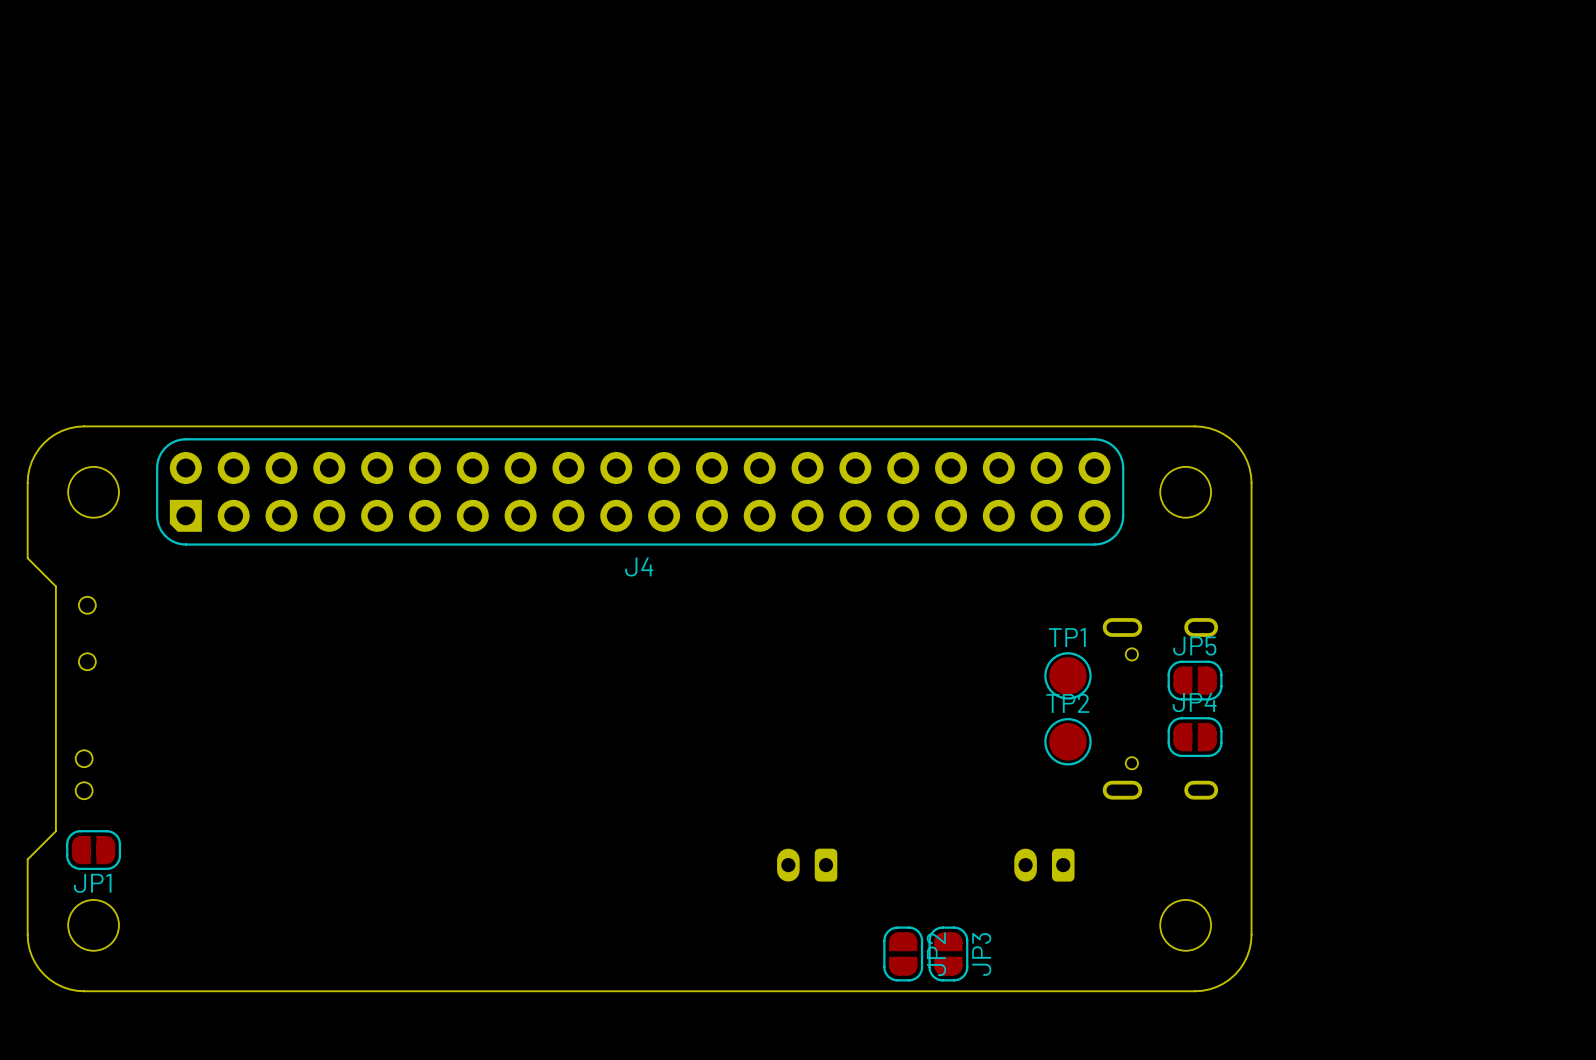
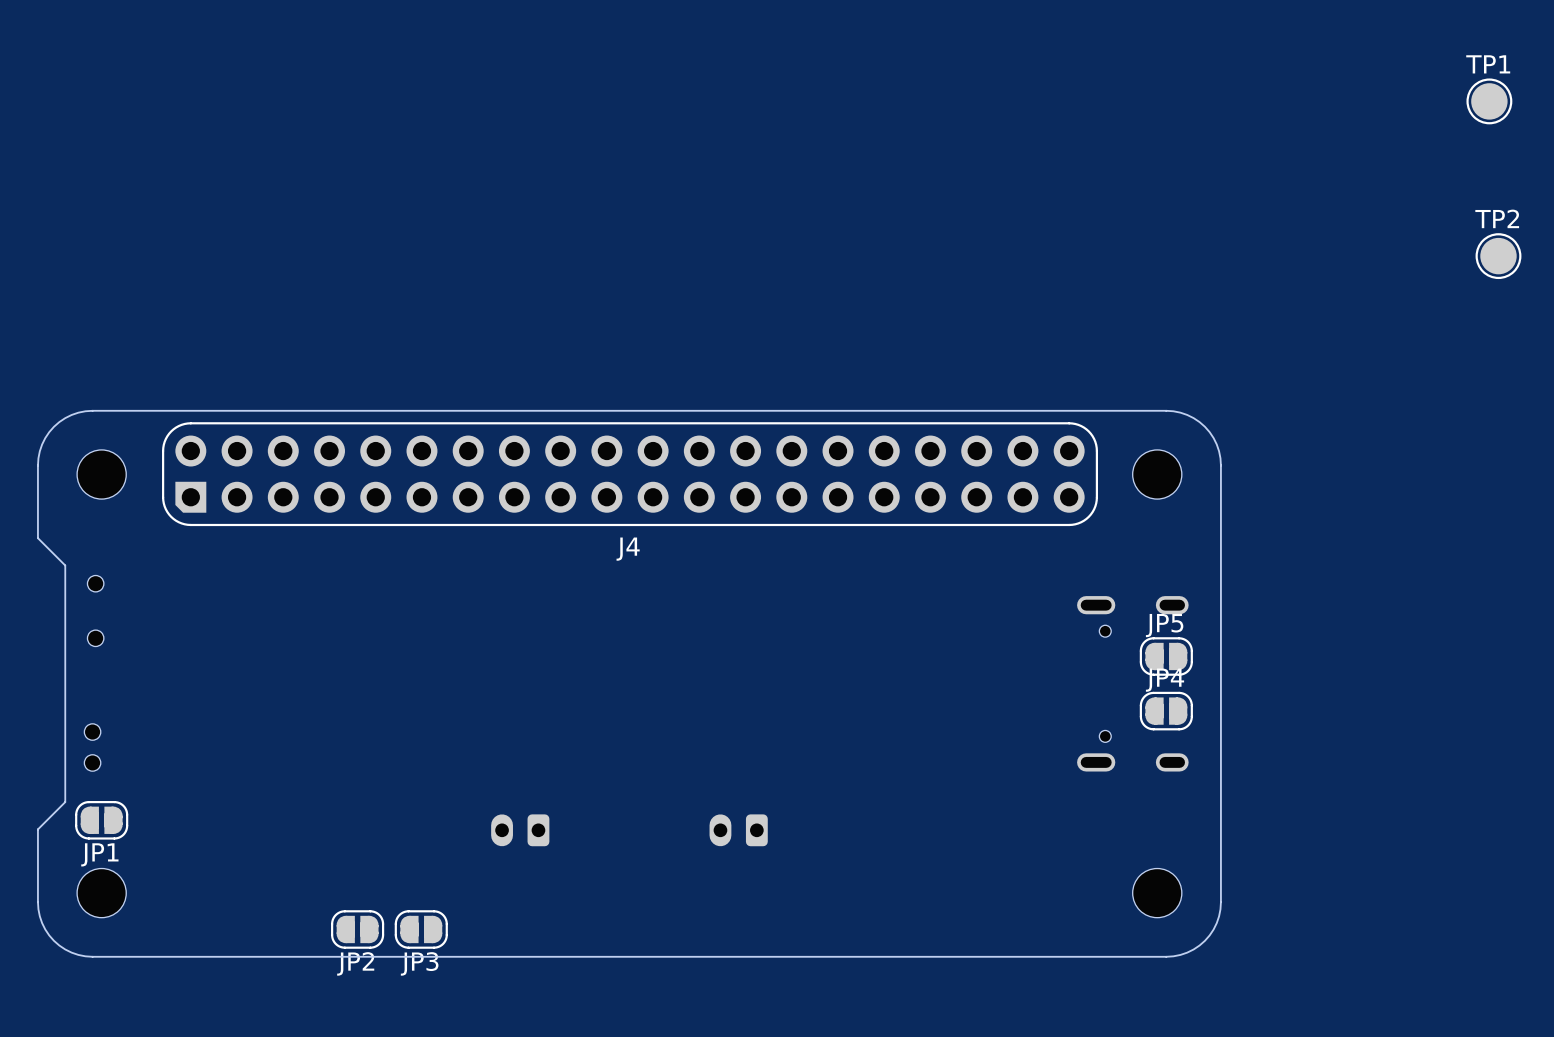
TP1 position: (1067, 675) -> (1489, 101)
TP2 position: (1067, 741) -> (1498, 256)
part: none -> (520, 830)
part position: (807, 865) -> (738, 830)
part: (1044, 865) -> none
JP2 rotation: 0° (903, 953) -> 90° clockwise (357, 929)
JP2 position: (903, 953) -> (357, 929)
JP3 rotation: 0° (948, 953) -> 90° clockwise (421, 929)
JP3 position: (948, 953) -> (421, 929)

